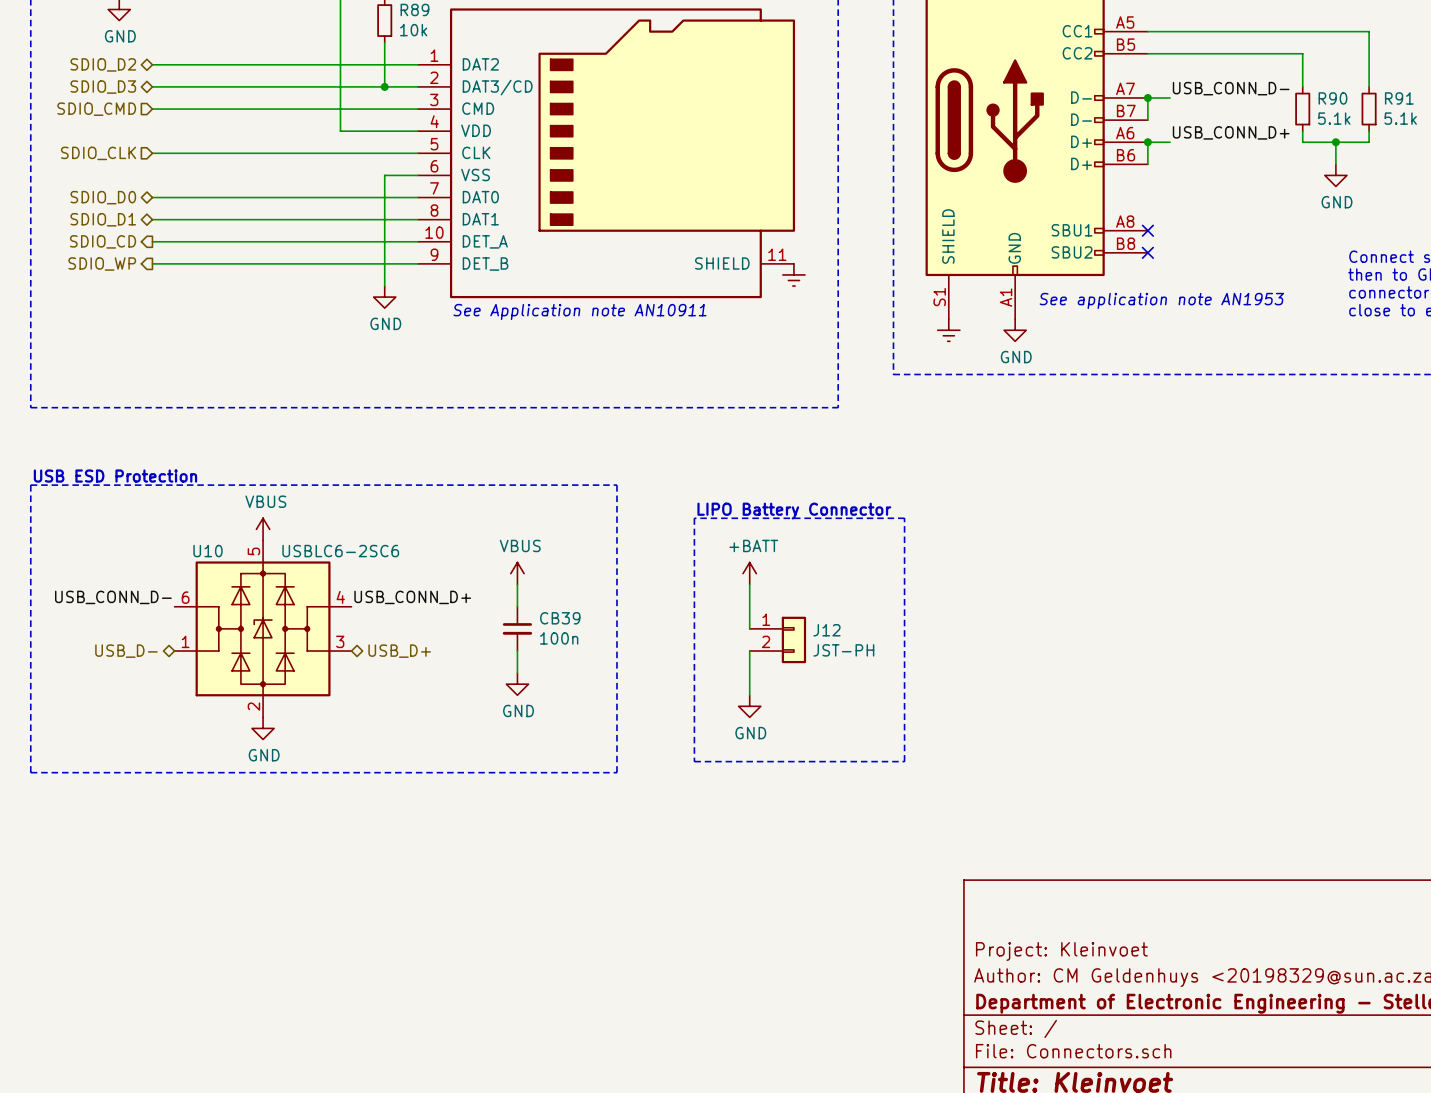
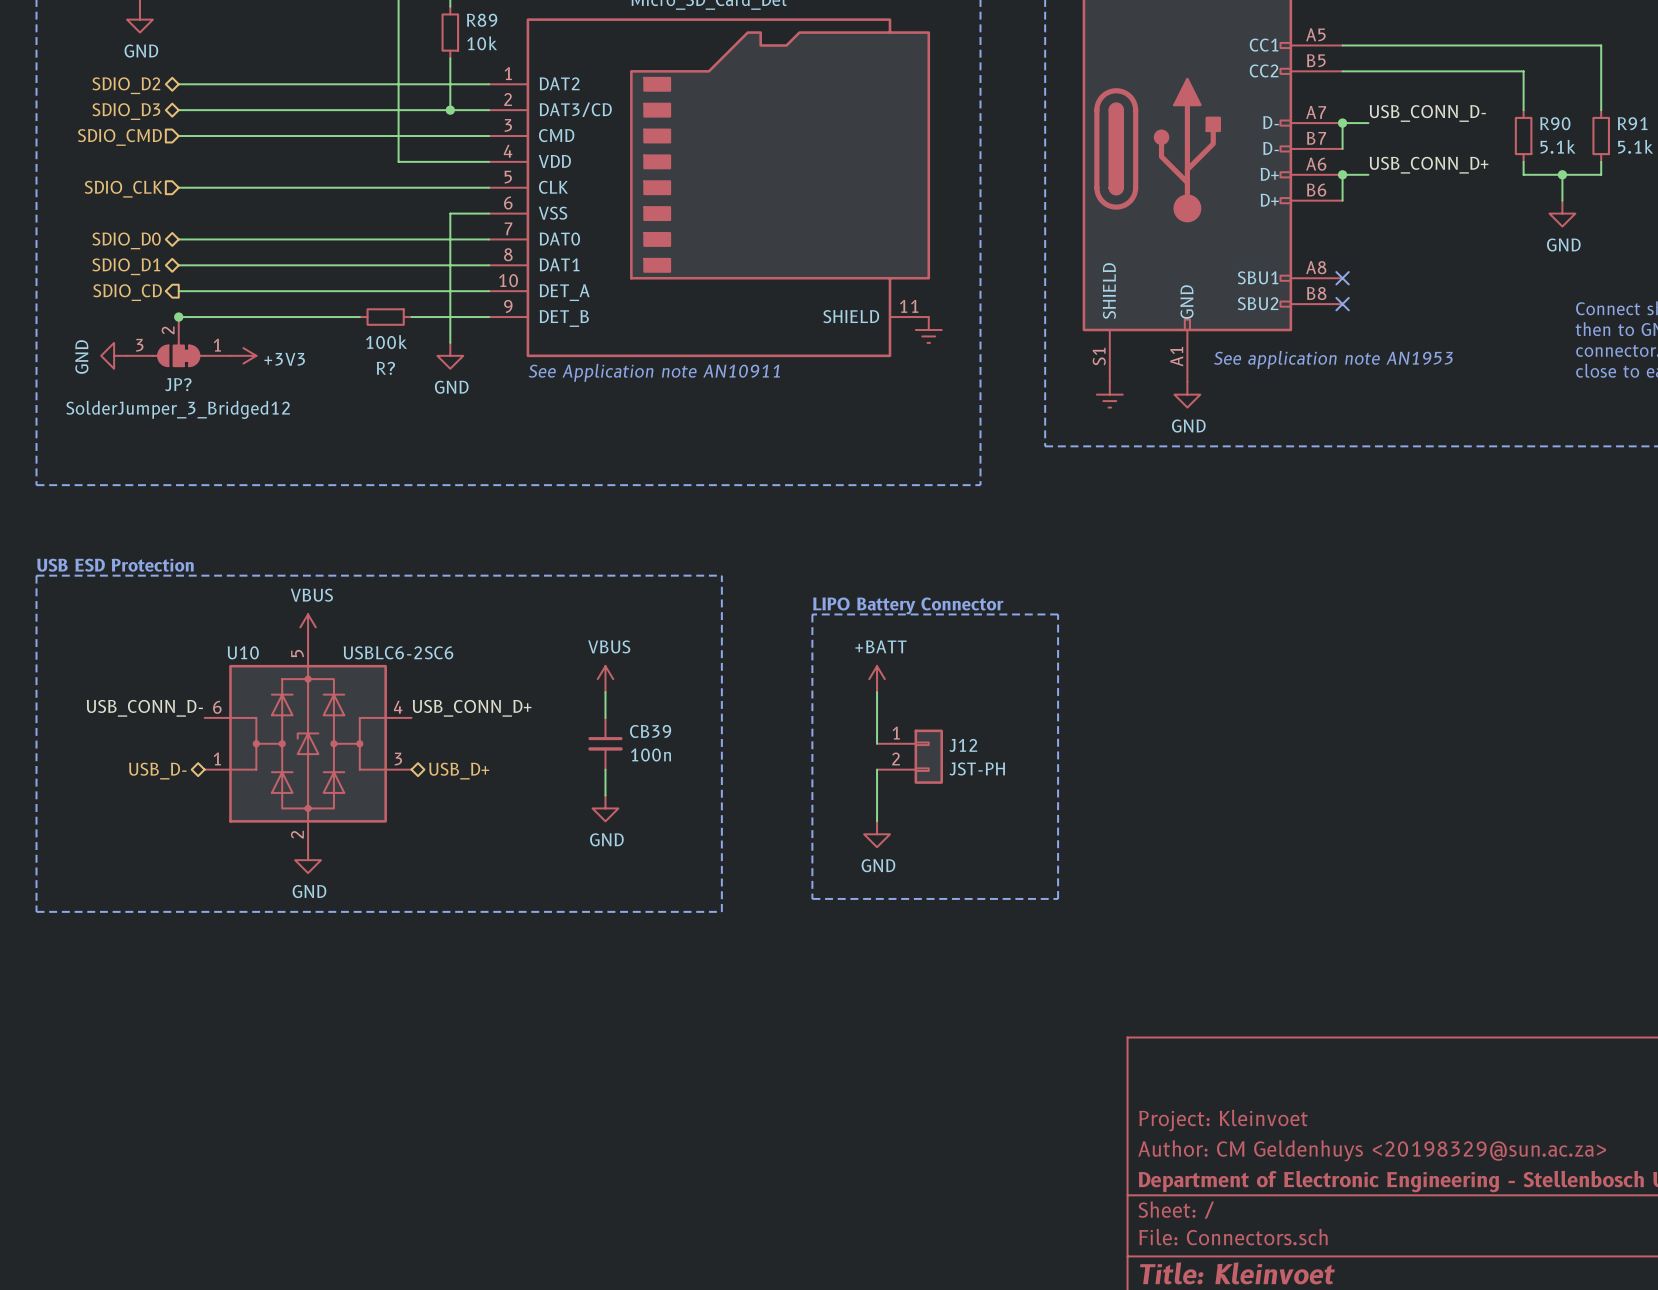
junction: none -> (178, 317)
wire: (307, 263) (351, 263) -> none
R?: none -> 100k (385, 317)
hierarchical label: SDIO_WP (102, 264) -> none
JP?: none -> SolderJumper_3_Bridged12 (178, 341)
power symbol: none -> GND (114, 355)
power symbol: none -> +3V3 (243, 355)

